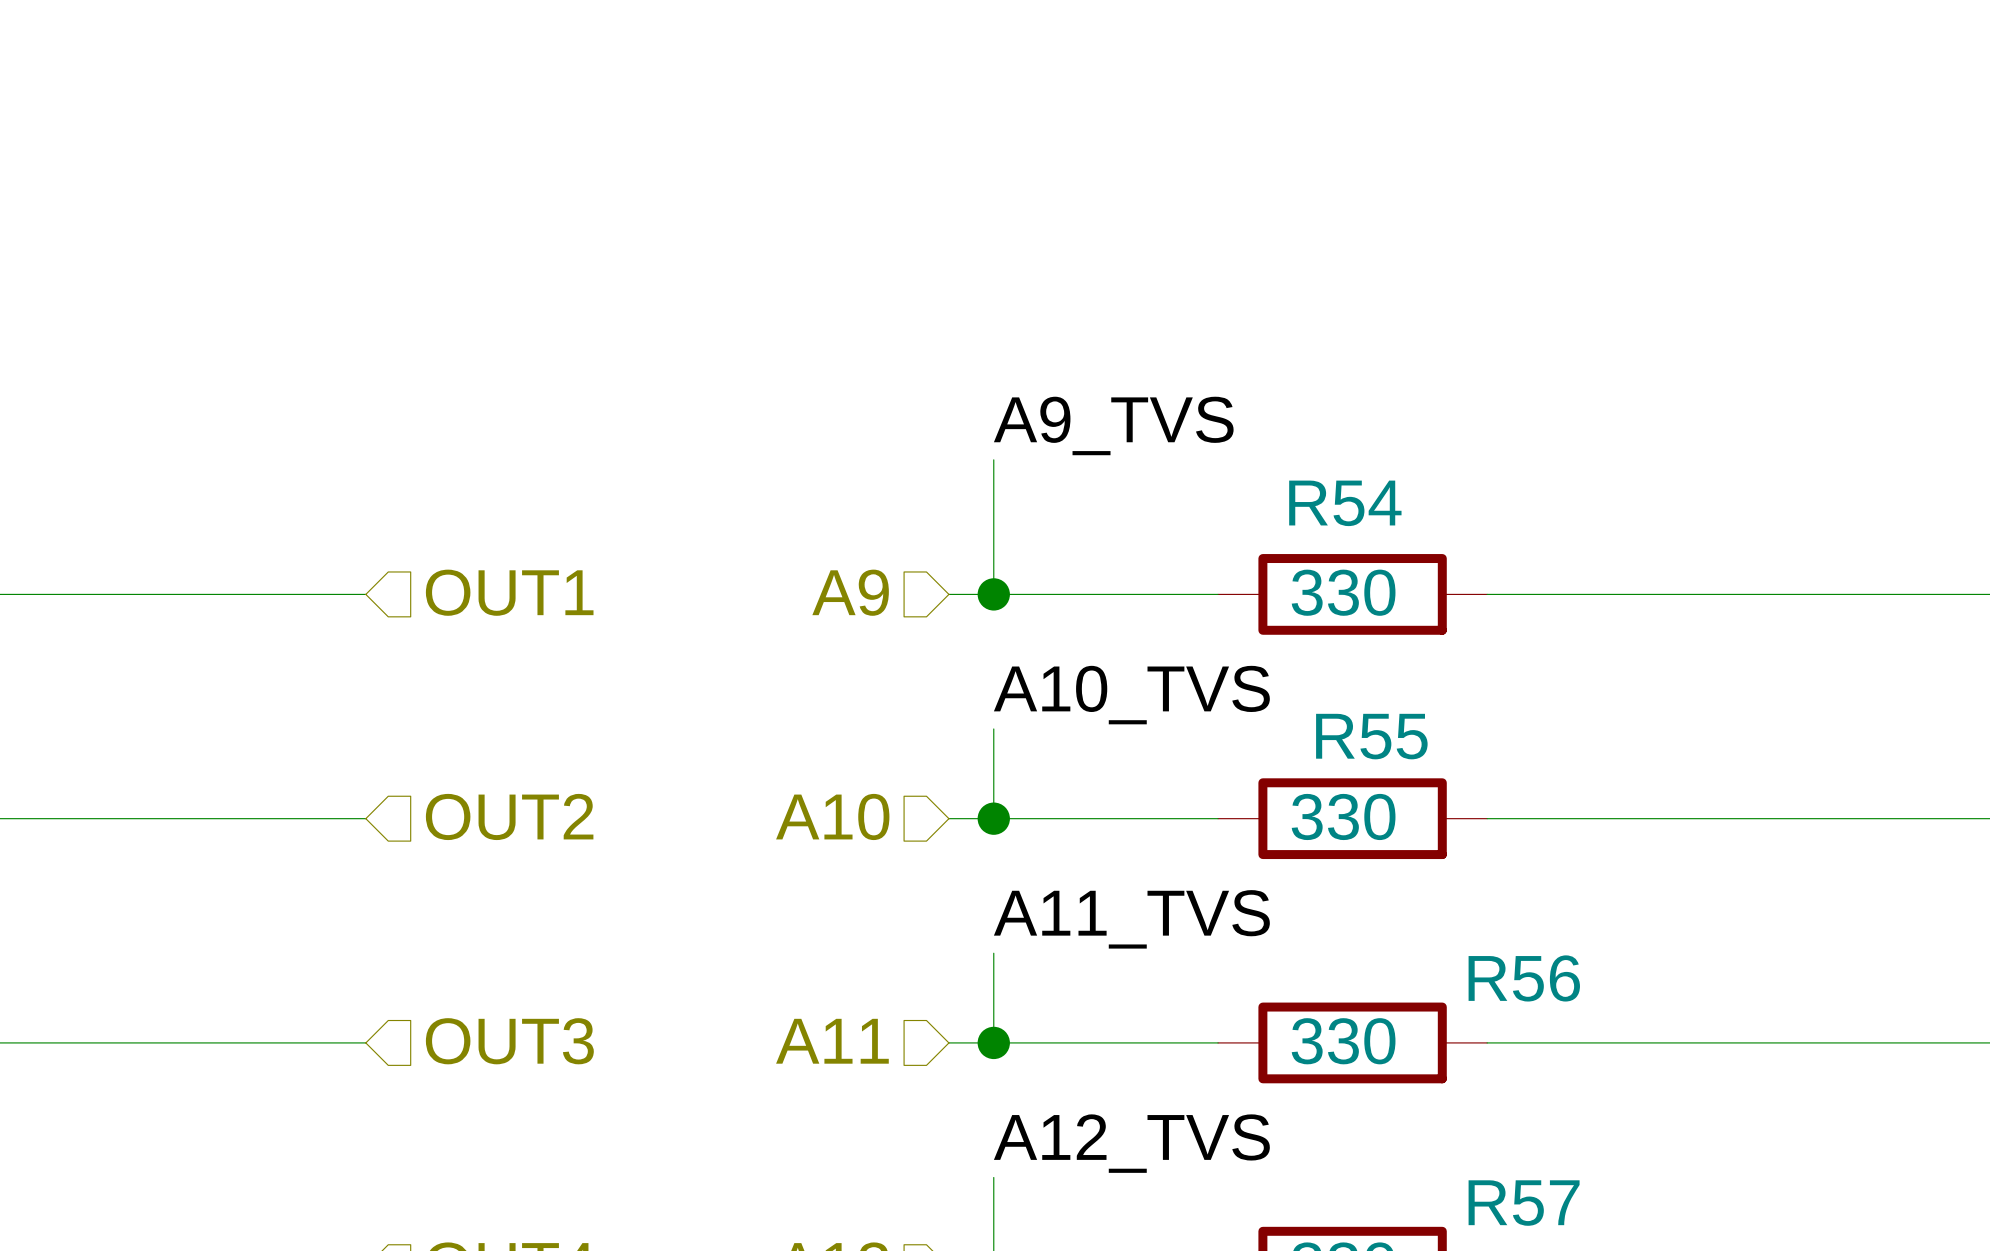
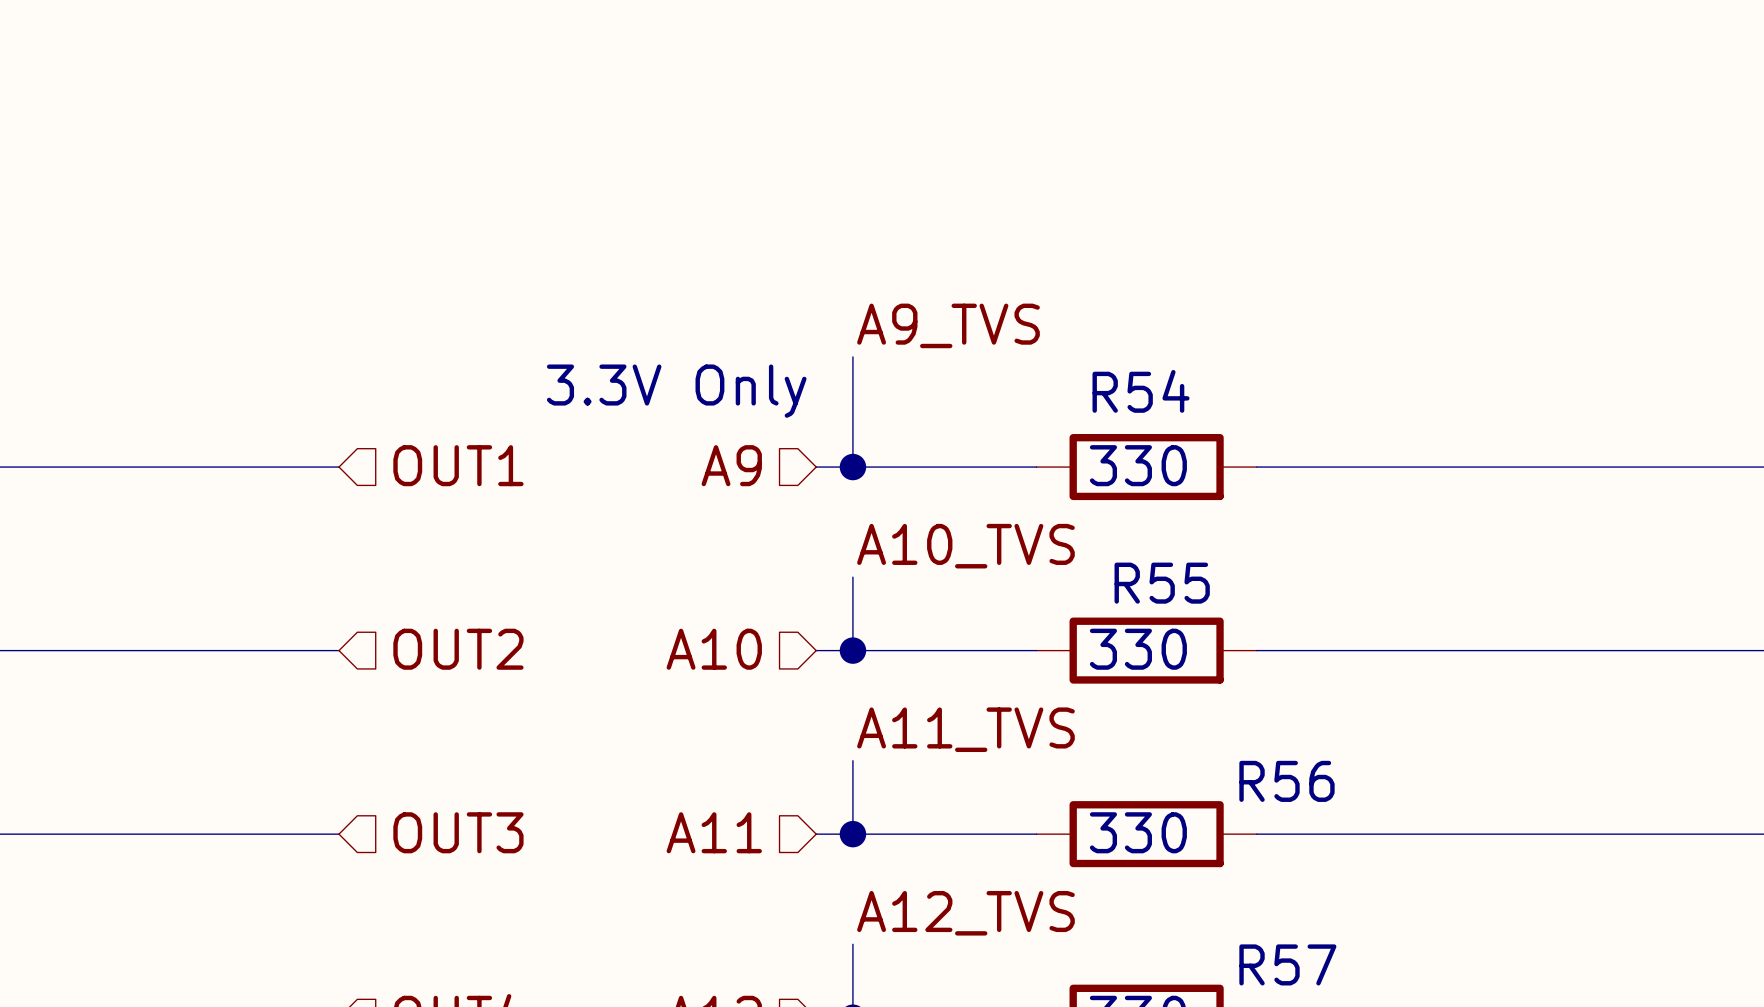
text: none -> 3.3V Only (676, 391)

